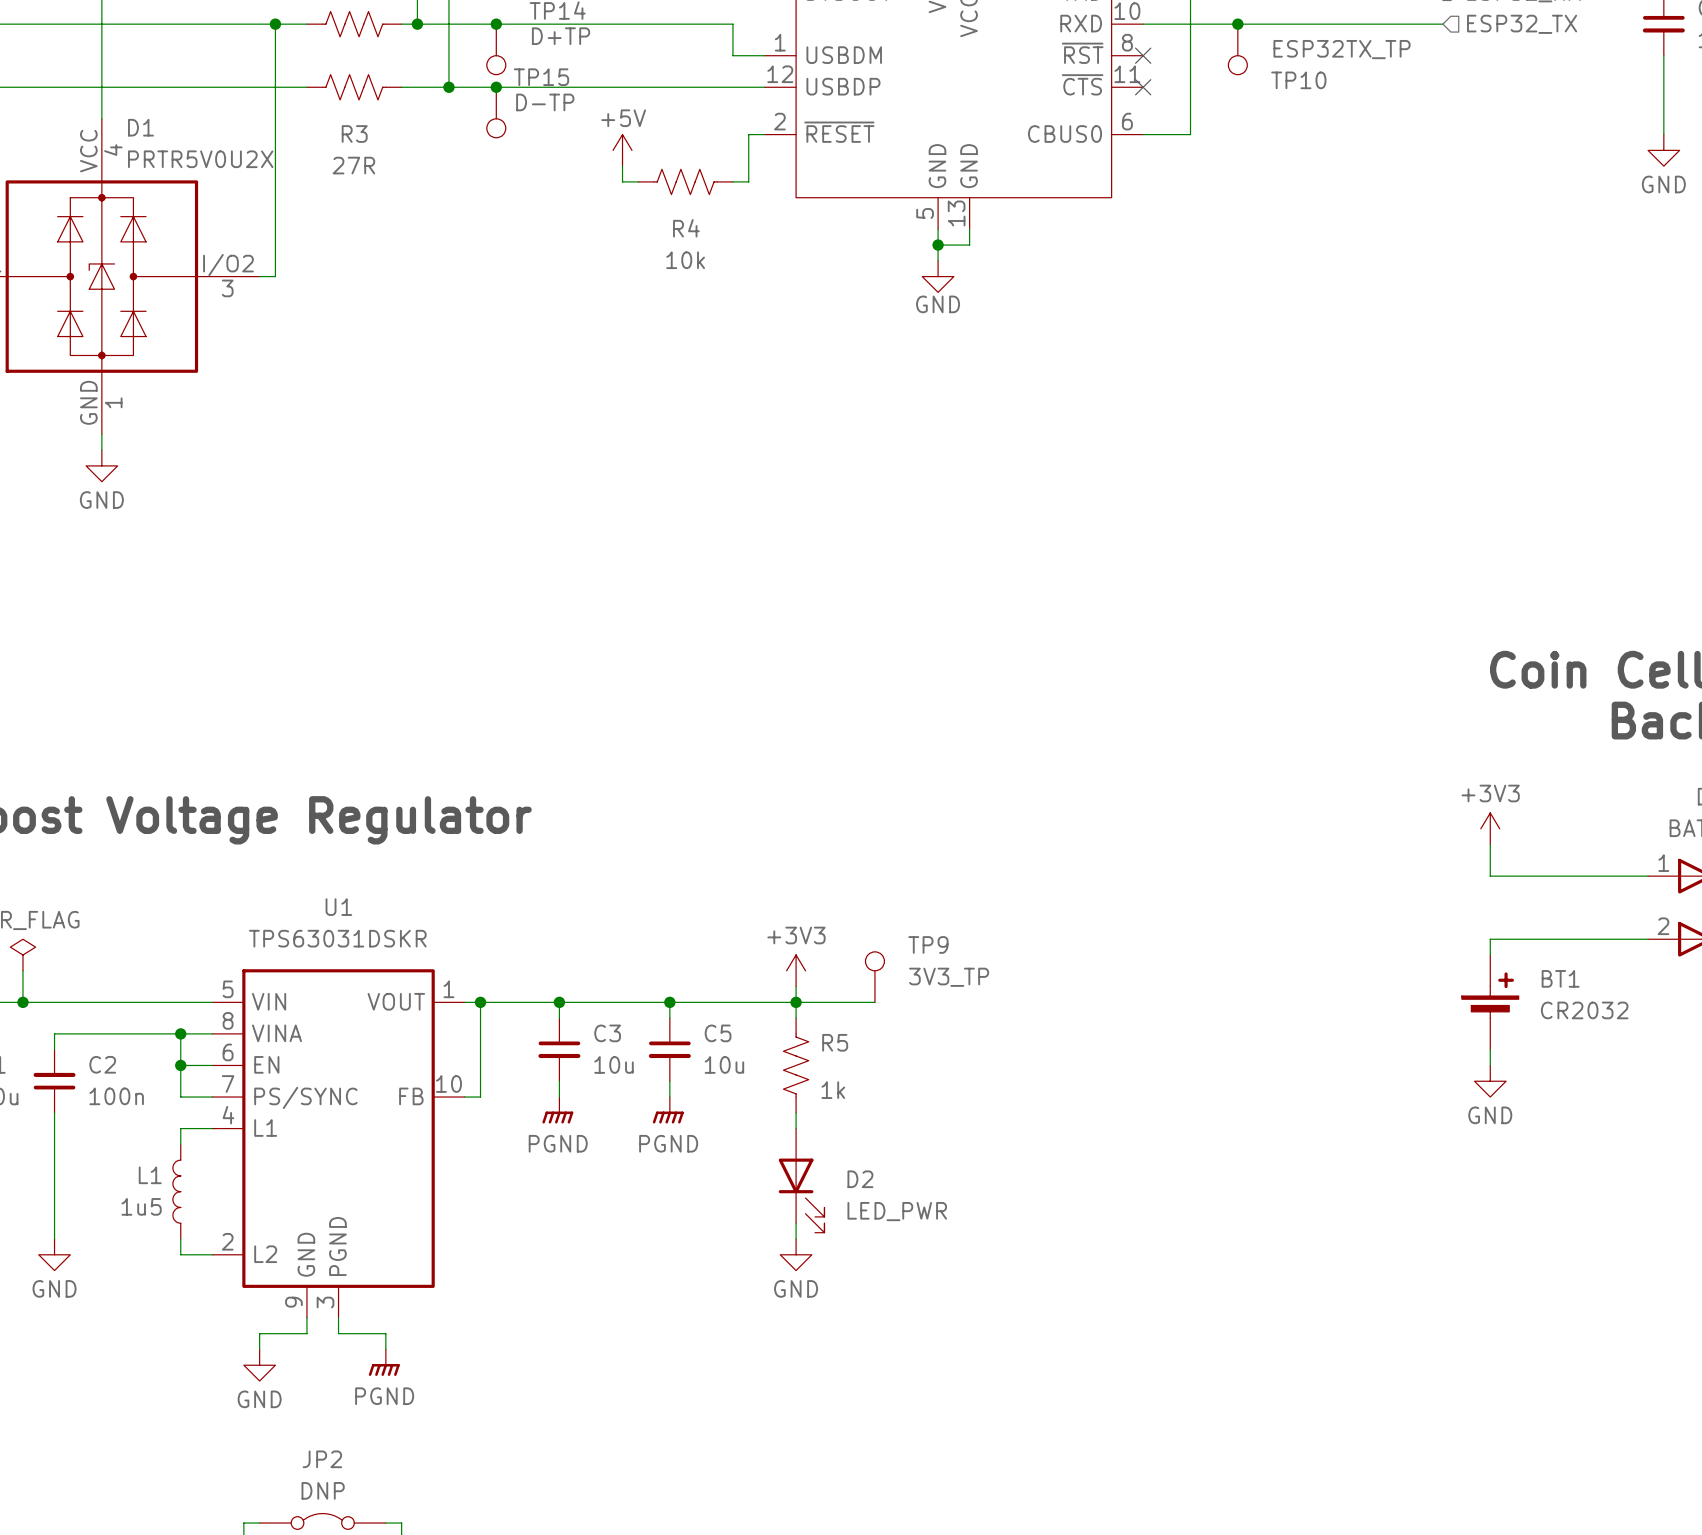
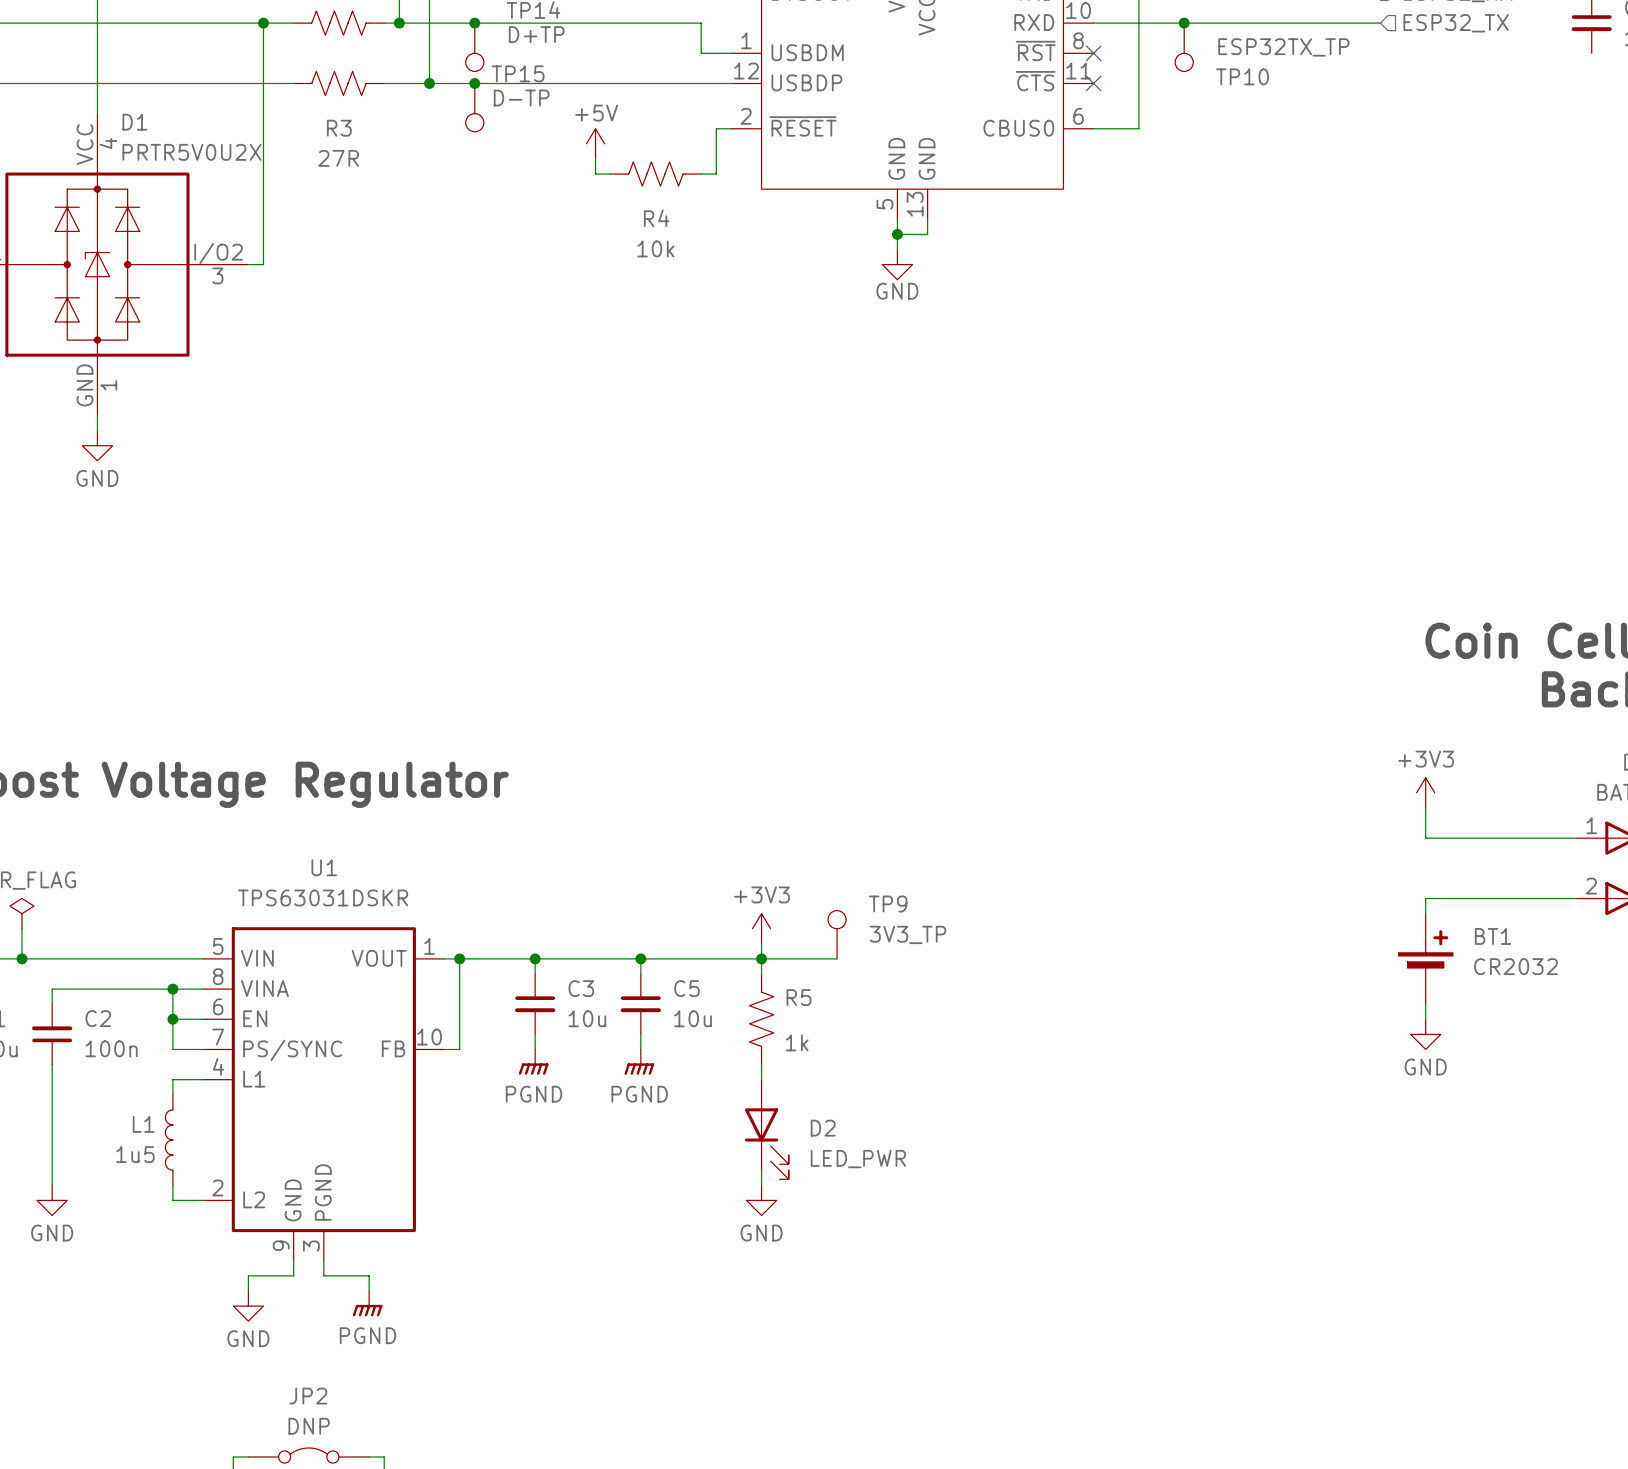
wire: (1663, 55) (1663, 134) -> none
power symbol: GND (1663, 150) -> none

